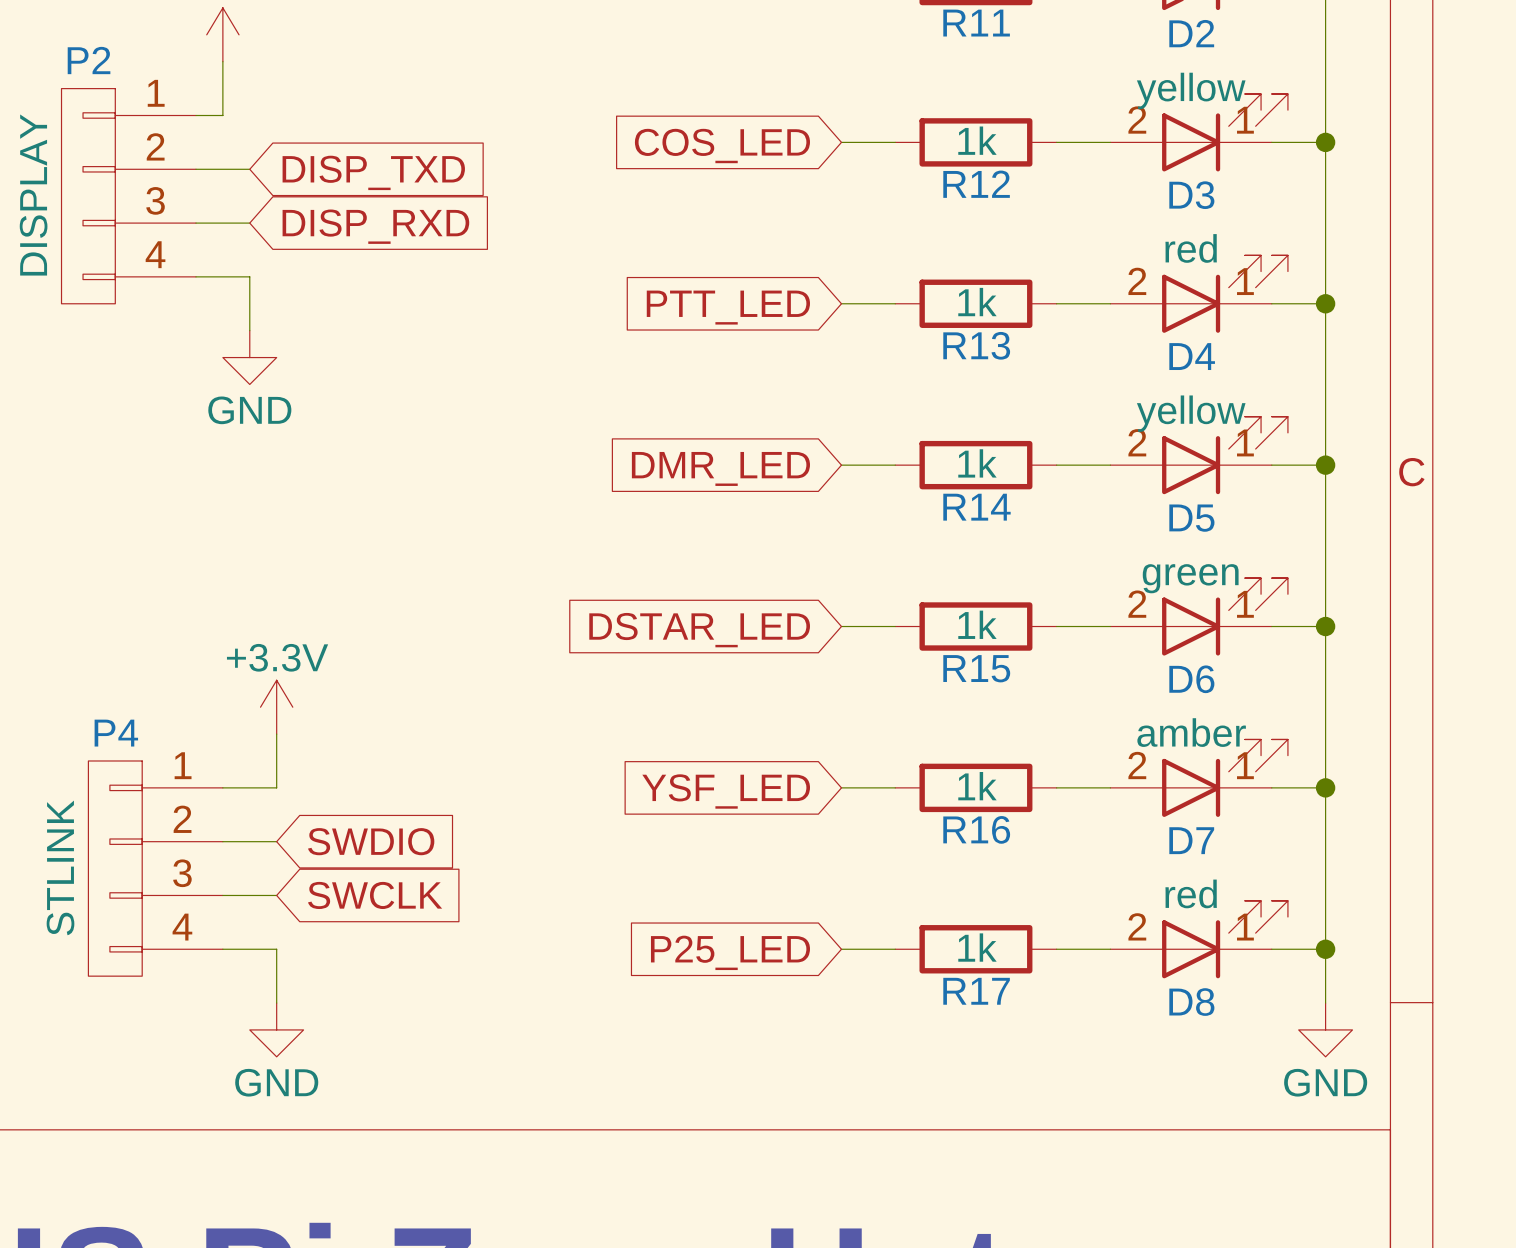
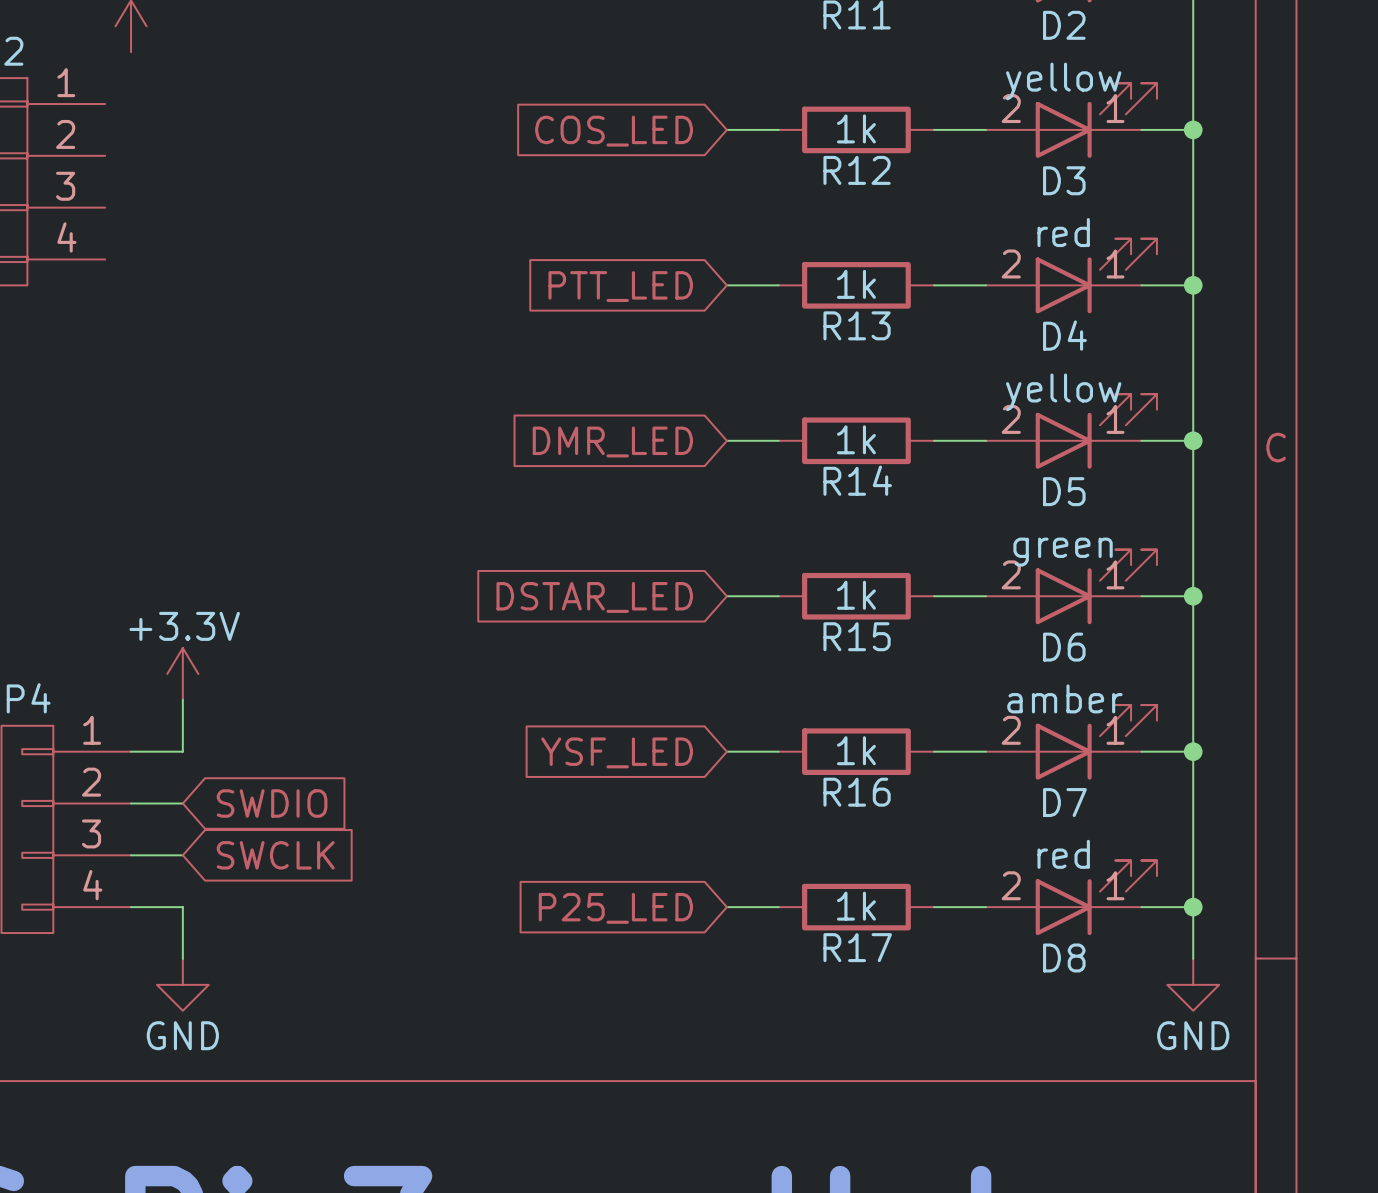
wire: (222, 61) (222, 115) (195, 115) -> none
wire: (195, 169) (249, 169) -> none
global label: DISP_TXD (373, 172) -> none
wire: (195, 223) (249, 223) -> none
global label: DISP_RXD (375, 226) -> none
wire: (195, 276) (249, 276) (249, 330) -> none
power symbol: GND (249, 357) -> none

